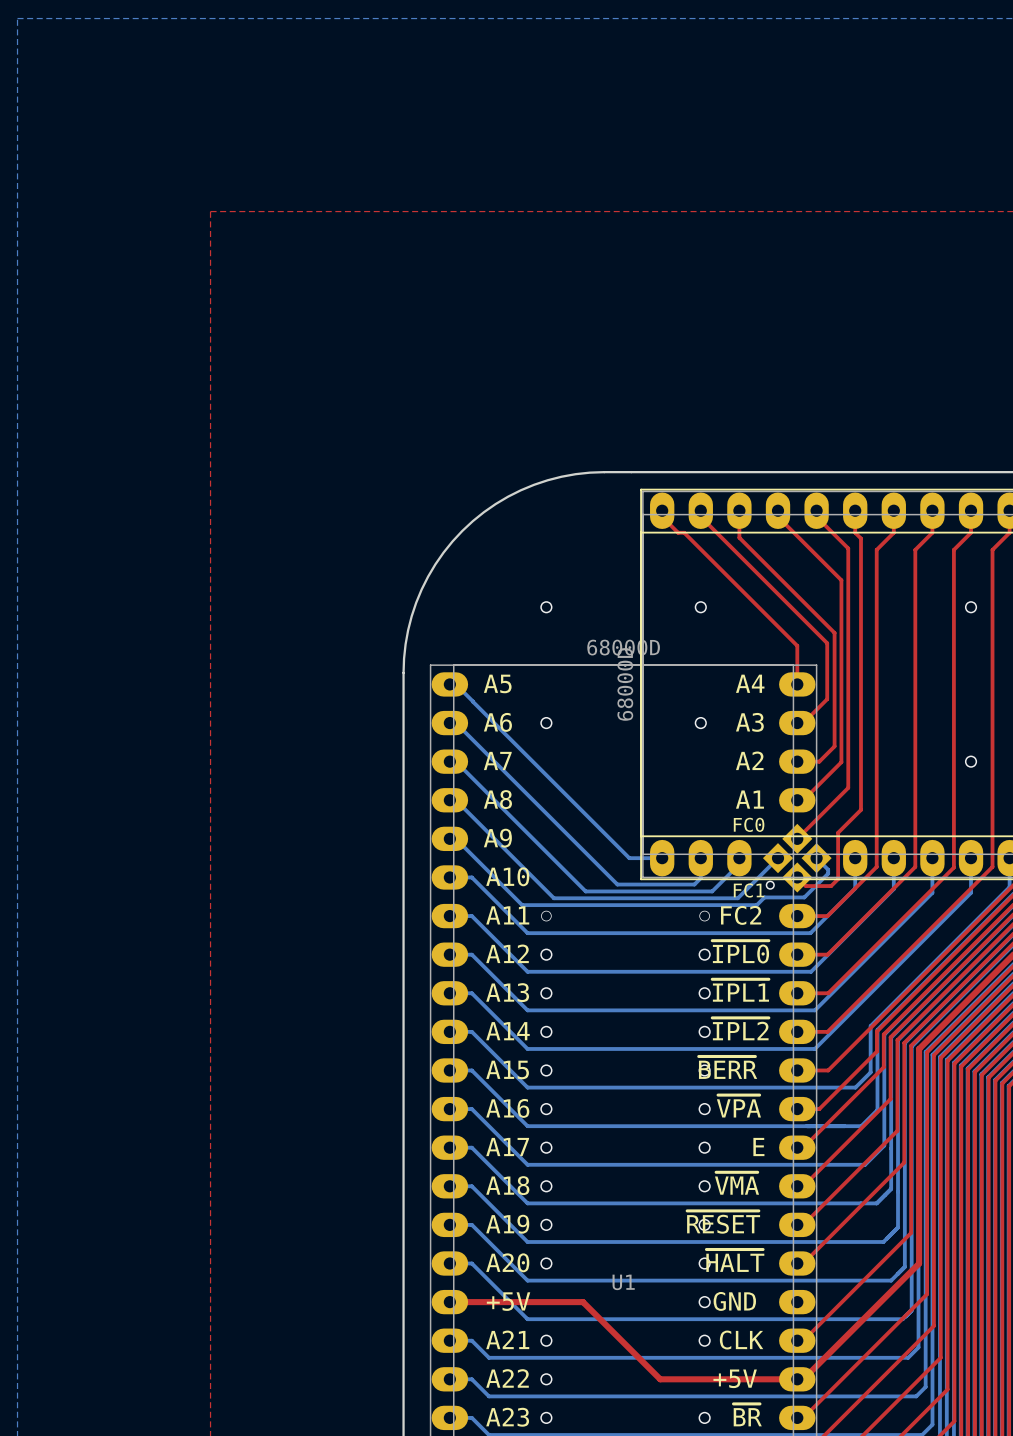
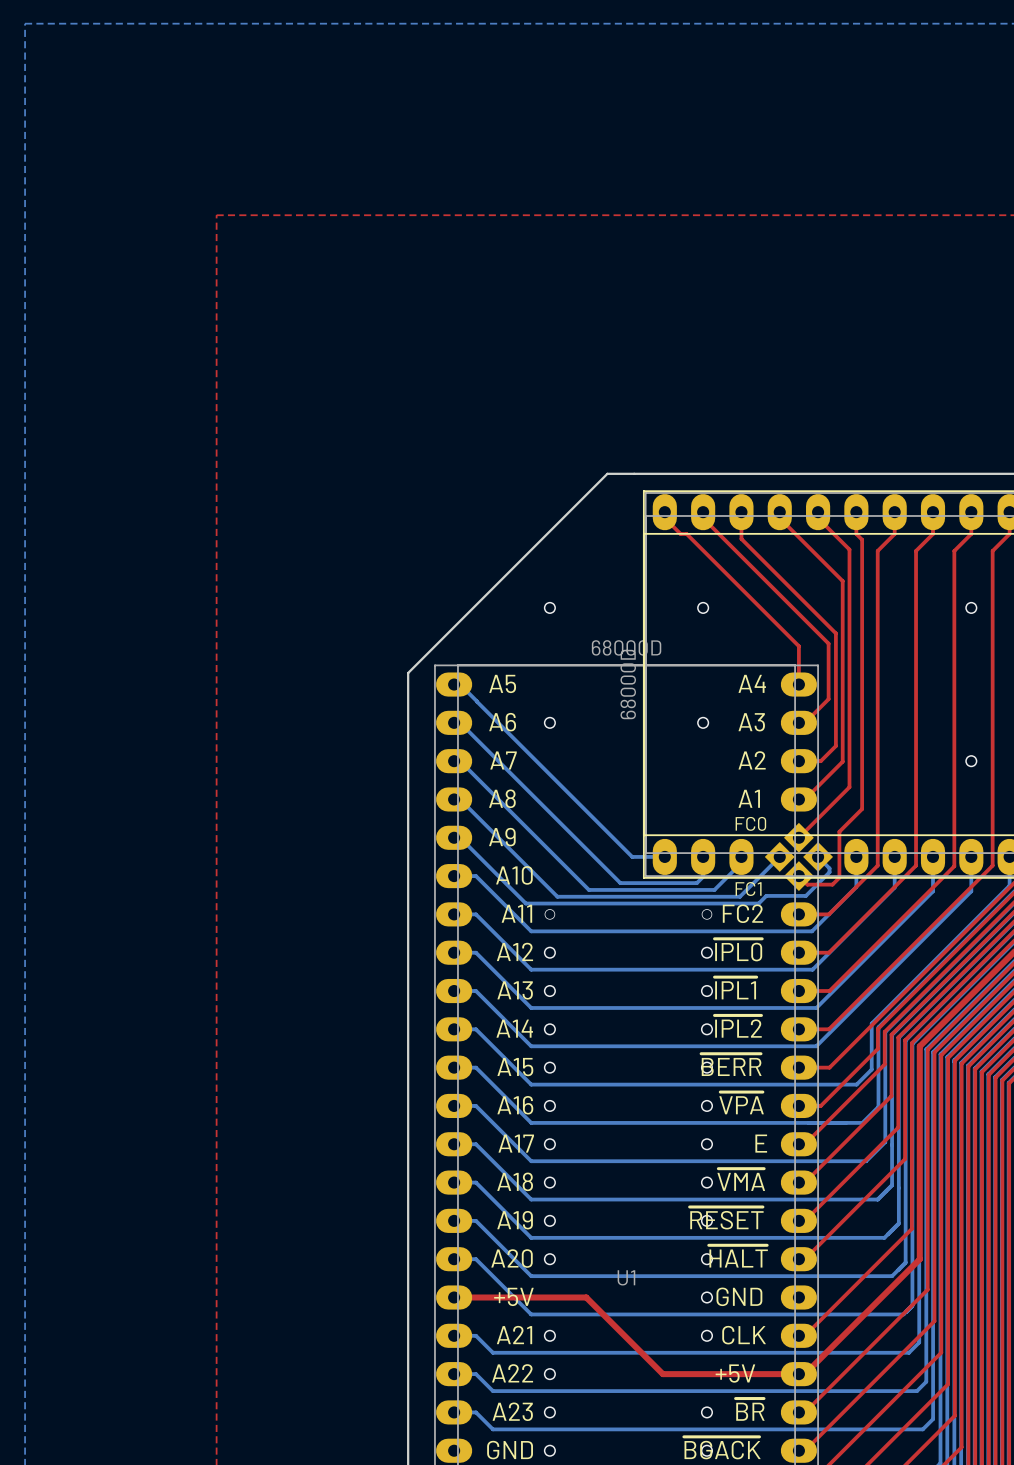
board edge: (604, 472) (561, 476) (534, 484) (495, 504) (462, 530) (435, 564) (416, 602) (405, 644) (403, 672) -> (607, 473) (408, 673)
via: (770, 885) -> none

